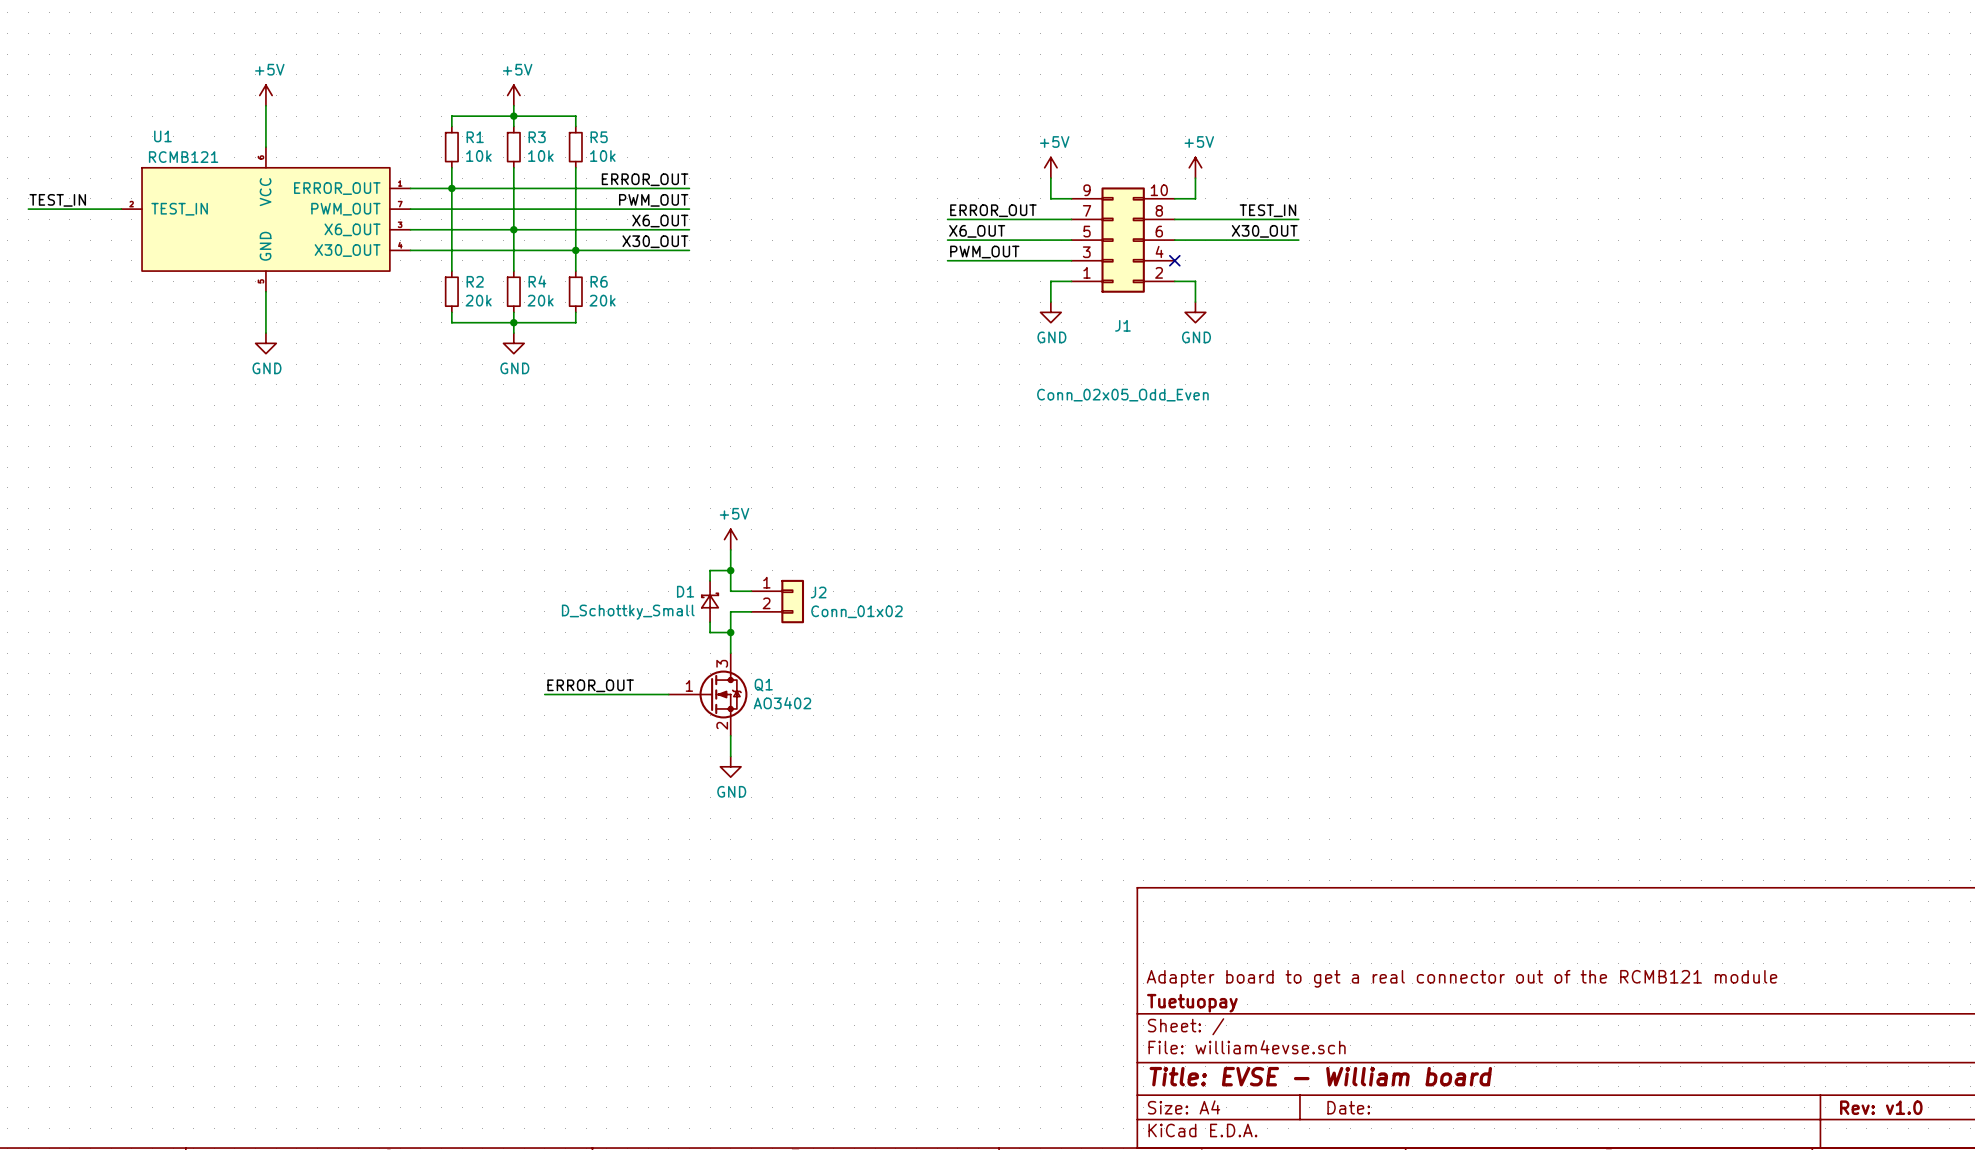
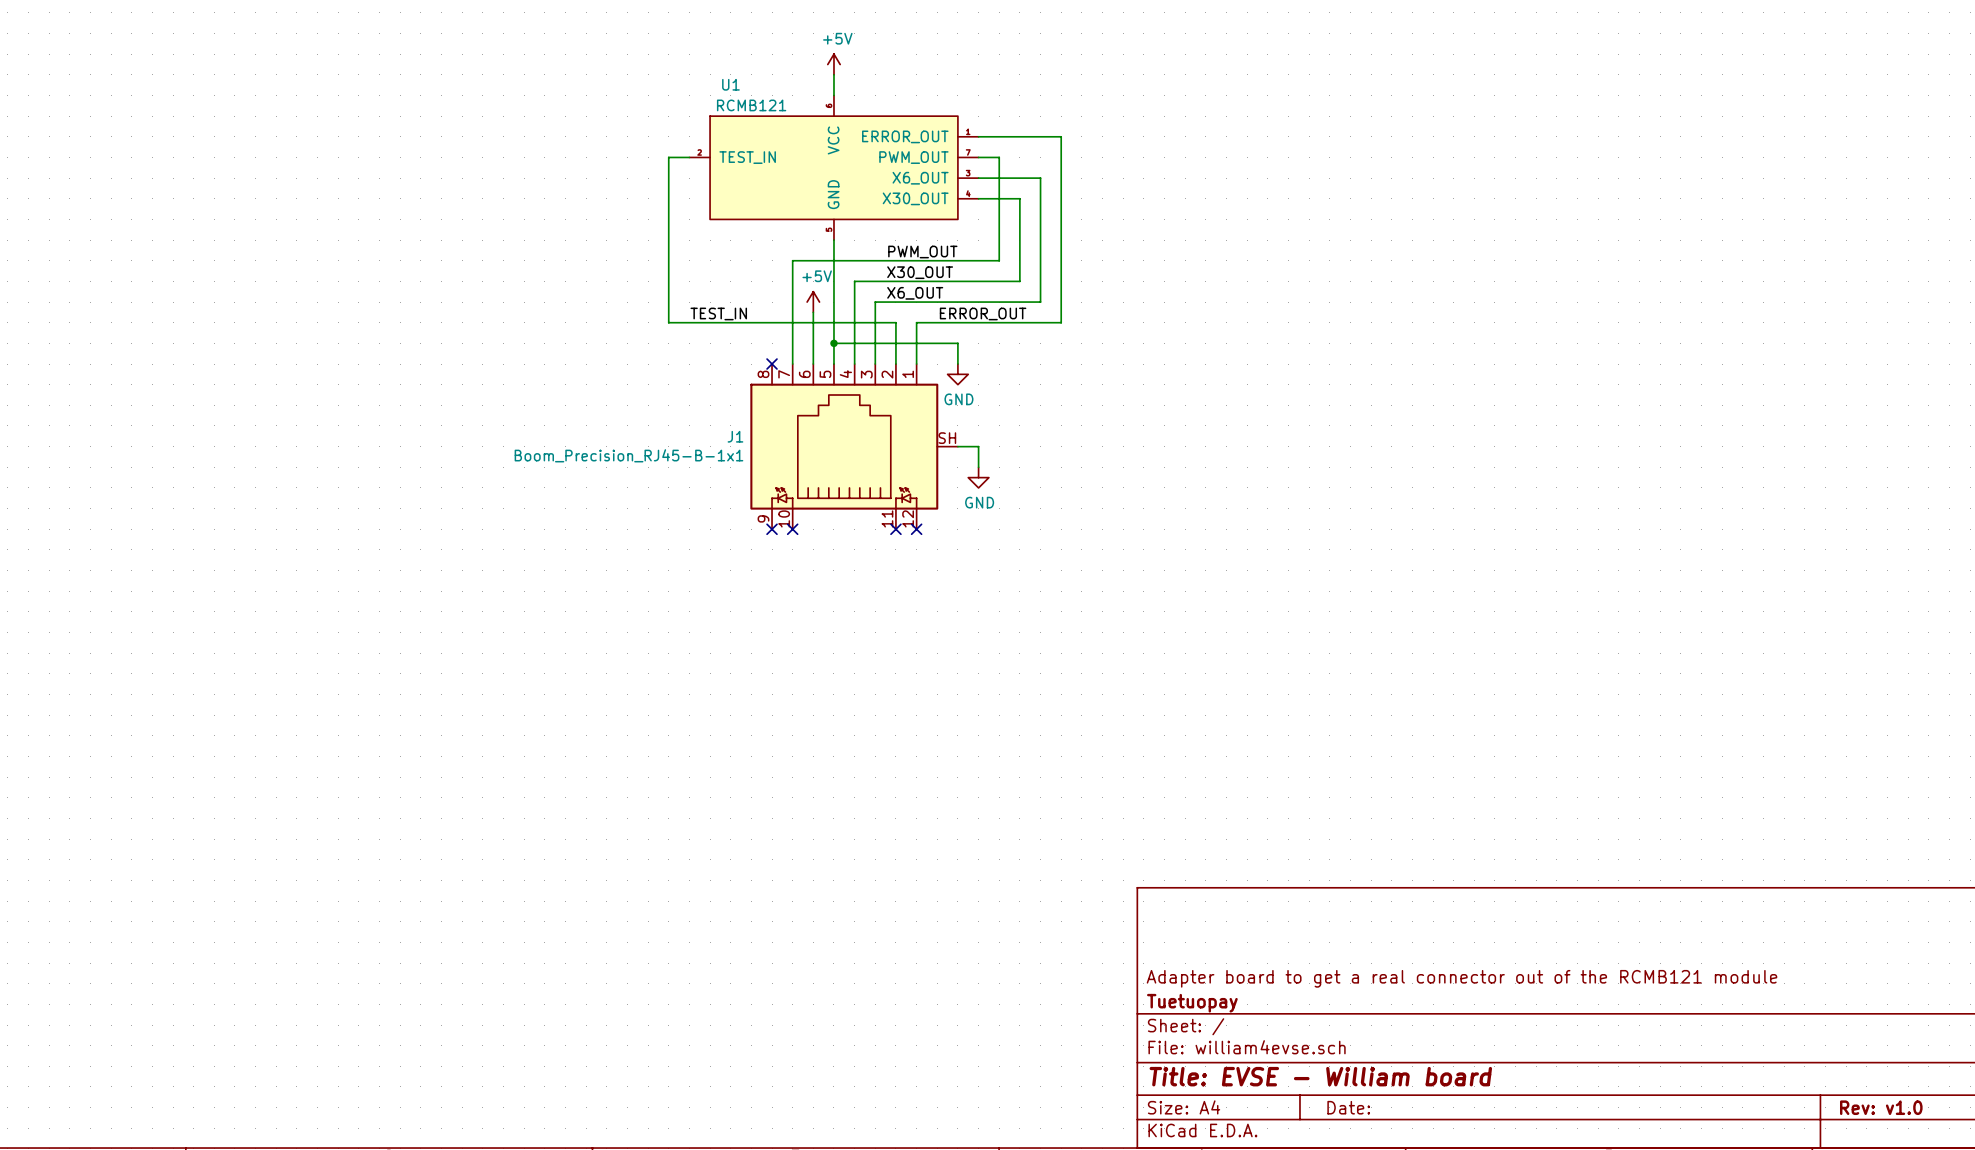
power symbol: none -> +5V (833, 64)
wire: none -> (833, 74) (833, 95)
power symbol: +5V (265, 95) -> none
power symbol: +5V (513, 95) -> none
wire: (265, 105) (265, 147) -> none
wire: (513, 105) (513, 126) -> none
junction: (513, 116) -> none
wire: (451, 126) (451, 116) (575, 116) (575, 126) -> none
wire: none -> (978, 136) (1061, 136) (1061, 322) (916, 322) (916, 364)
R1: 10k (451, 147) -> none
R3: 10k (513, 147) -> none
R5: 10k (575, 147) -> none
wire: none -> (689, 157) (668, 157) (668, 322) (895, 322) (895, 364)
wire: (451, 167) (451, 271) -> none
wire: (513, 167) (513, 271) -> none
wire: (575, 167) (575, 271) -> none
power symbol: +5V (1050, 167) -> none
power symbol: +5V (1195, 167) -> none
wire: none -> (978, 178) (1040, 178) (1040, 302) (875, 302) (875, 364)
wire: (1050, 178) (1050, 198) (1071, 198) -> none
wire: (1195, 178) (1195, 198) (1174, 198) -> none
label: ERROR_OUT (645, 179) -> none
J1 symbol: [1071, 187, 1175, 293] -> [750, 364, 958, 530]
wire: (410, 188) (689, 188) -> none
junction: (451, 188) -> none
wire: none -> (978, 198) (1019, 198) (1019, 281) (854, 281) (854, 364)
label: TEST_IN (57, 200) -> none
label: PWM_OUT (653, 200) -> none
wire: (28, 209) (121, 209) -> none
wire: (410, 209) (689, 209) -> none
label position: ERROR_OUT (993, 210) -> ERROR_OUT (983, 313)
label: TEST_IN (1267, 210) -> none
U1 position: (265, 219) -> (833, 167)
wire: (947, 219) (1071, 219) -> none
wire: (1174, 219) (1298, 219) -> none
label: X6_OUT (660, 221) -> none
wire: (410, 229) (689, 229) -> none
junction: (513, 229) -> none
label position: X6_OUT (977, 231) -> X6_OUT (915, 293)
label: X30_OUT (1264, 231) -> none
wire: none -> (833, 240) (833, 364)
wire: (947, 240) (1071, 240) -> none
wire: (1174, 240) (1298, 240) -> none
label position: X30_OUT (655, 241) -> X30_OUT (920, 272)
wire: (410, 250) (689, 250) -> none
junction: (575, 250) -> none
label position: PWM_OUT (984, 252) -> PWM_OUT (922, 252)
wire: none -> (947, 260) (792, 260) (792, 364)
wire: (999, 260) (1071, 260) -> (999, 260) (999, 157) (978, 157)
no-connect mark: (1174, 260) -> none
wire: (1071, 281) (1050, 281) (1050, 302) -> none
wire: (1174, 281) (1195, 281) (1195, 302) -> none
wire: (265, 291) (265, 333) -> none
R2: 20k (451, 291) -> none
R4: 20k (513, 291) -> none
R6: 20k (575, 291) -> none
power symbol: none -> +5V (813, 302)
wire: (451, 312) (451, 322) (575, 322) (575, 312) -> none
wire: (513, 312) (513, 333) -> none
wire: none -> (813, 312) (813, 364)
power symbol: GND (1050, 312) -> none
power symbol: GND (1195, 312) -> none
label: none -> TEST_IN (718, 313)
junction: (513, 322) -> none
J1 name position: J1 (1122, 325) -> J1 (735, 436)
power symbol: GND (265, 343) -> none
power symbol: GND (513, 343) -> none
wire: none -> (833, 343) (957, 343) (957, 364)
junction: none -> (833, 343)
no-connect mark: none -> (772, 364)
power symbol: none -> GND (957, 374)
J1 value: Conn_02x05_Odd_Even (1122, 395) -> Boom_Precision_RJ45-B-1x1 (628, 455)
wire: none -> (957, 446) (978, 446) (978, 467)
power symbol: none -> GND (978, 477)
no-connect mark: none -> (772, 529)
no-connect mark: none -> (792, 529)
no-connect mark: none -> (895, 529)
no-connect mark: none -> (916, 529)
power symbol: +5V (730, 539) -> none
wire: (730, 549) (730, 591) (751, 591) -> none
wire: (730, 570) (710, 570) (710, 580) -> none
junction: (730, 570) -> none
D1: D_Schottky_Small (710, 601) -> none
J2: Conn_01x02 (777, 601) -> none
wire: (751, 611) (730, 611) (730, 653) -> none
wire: (710, 622) (710, 632) (730, 632) -> none
junction: (730, 632) -> none
label: ERROR_OUT (590, 685) -> none
wire: (544, 694) (668, 694) -> none
Q1: AO3402 (708, 694) -> none
wire: (730, 735) (730, 756) -> none
power symbol: GND (730, 766) -> none

